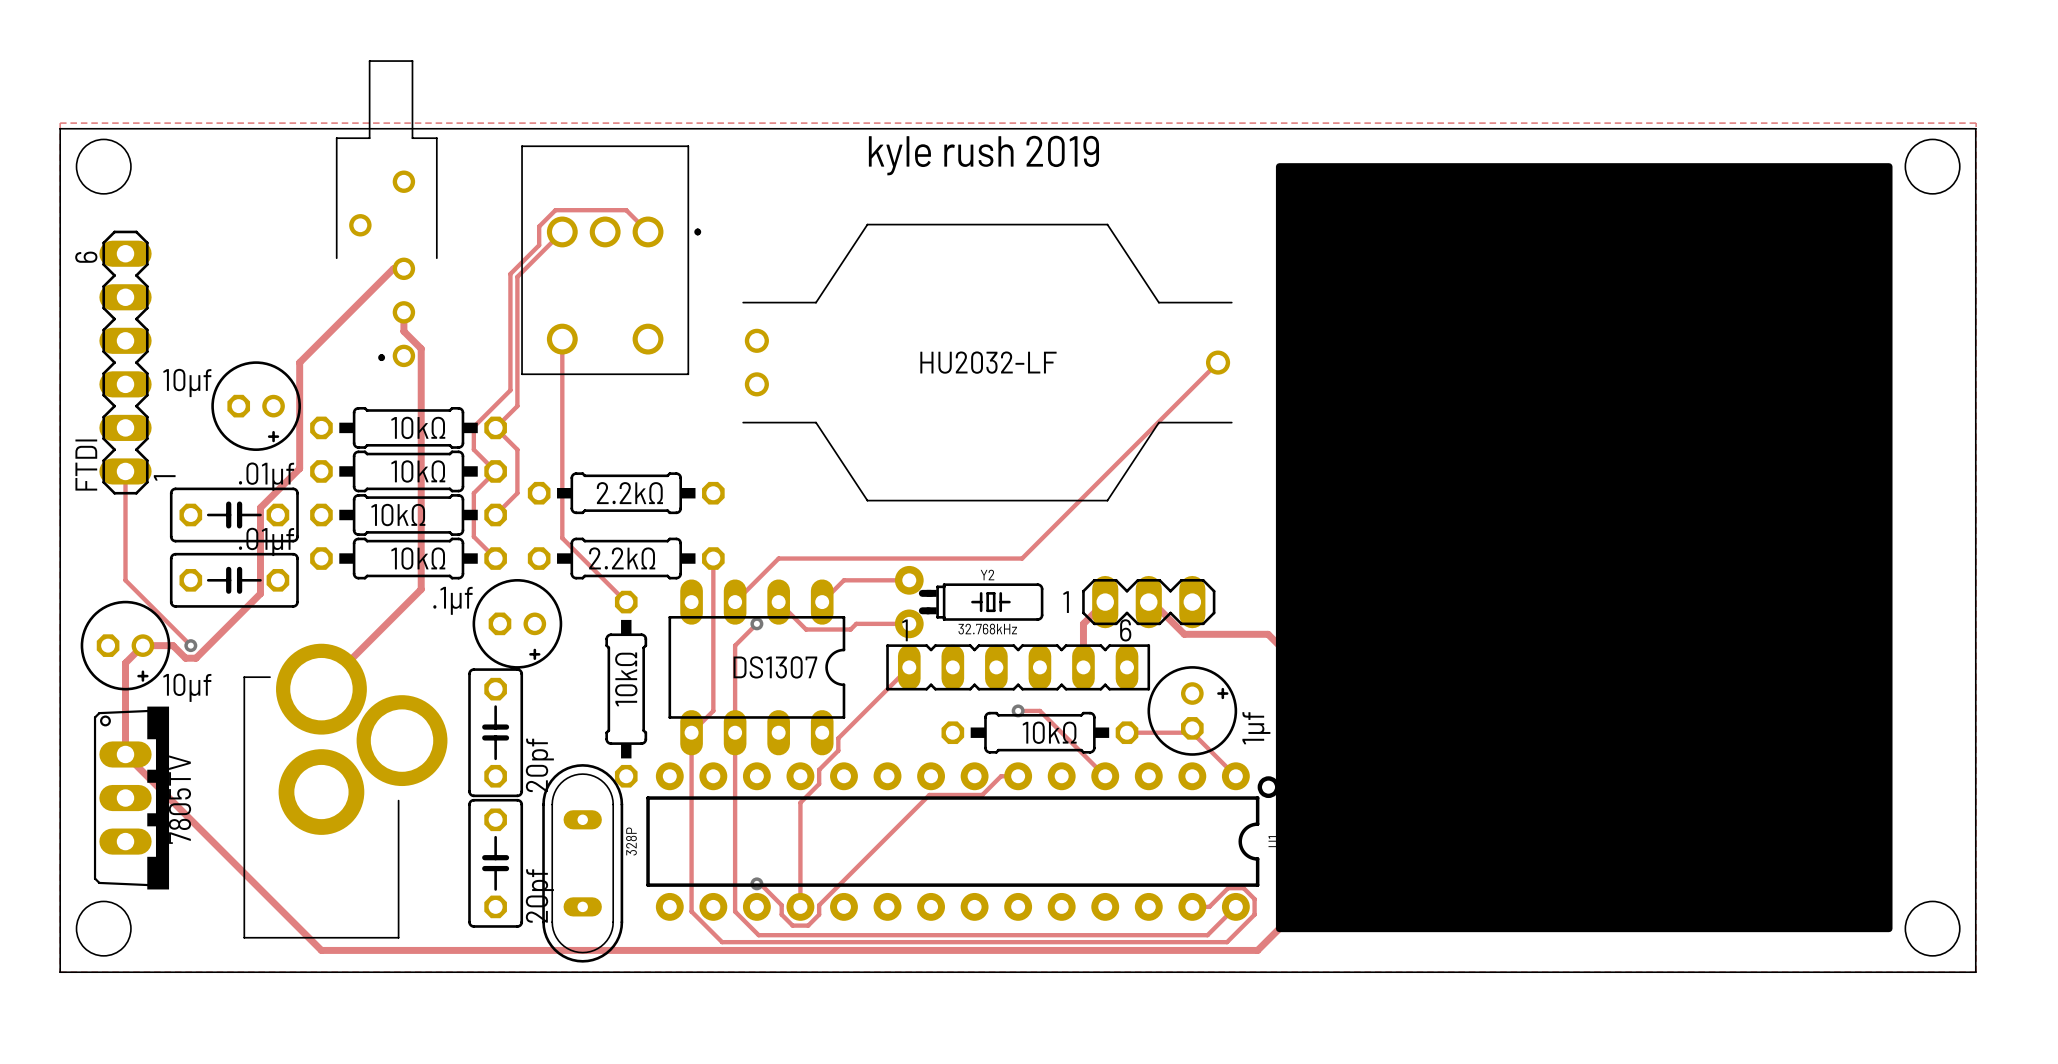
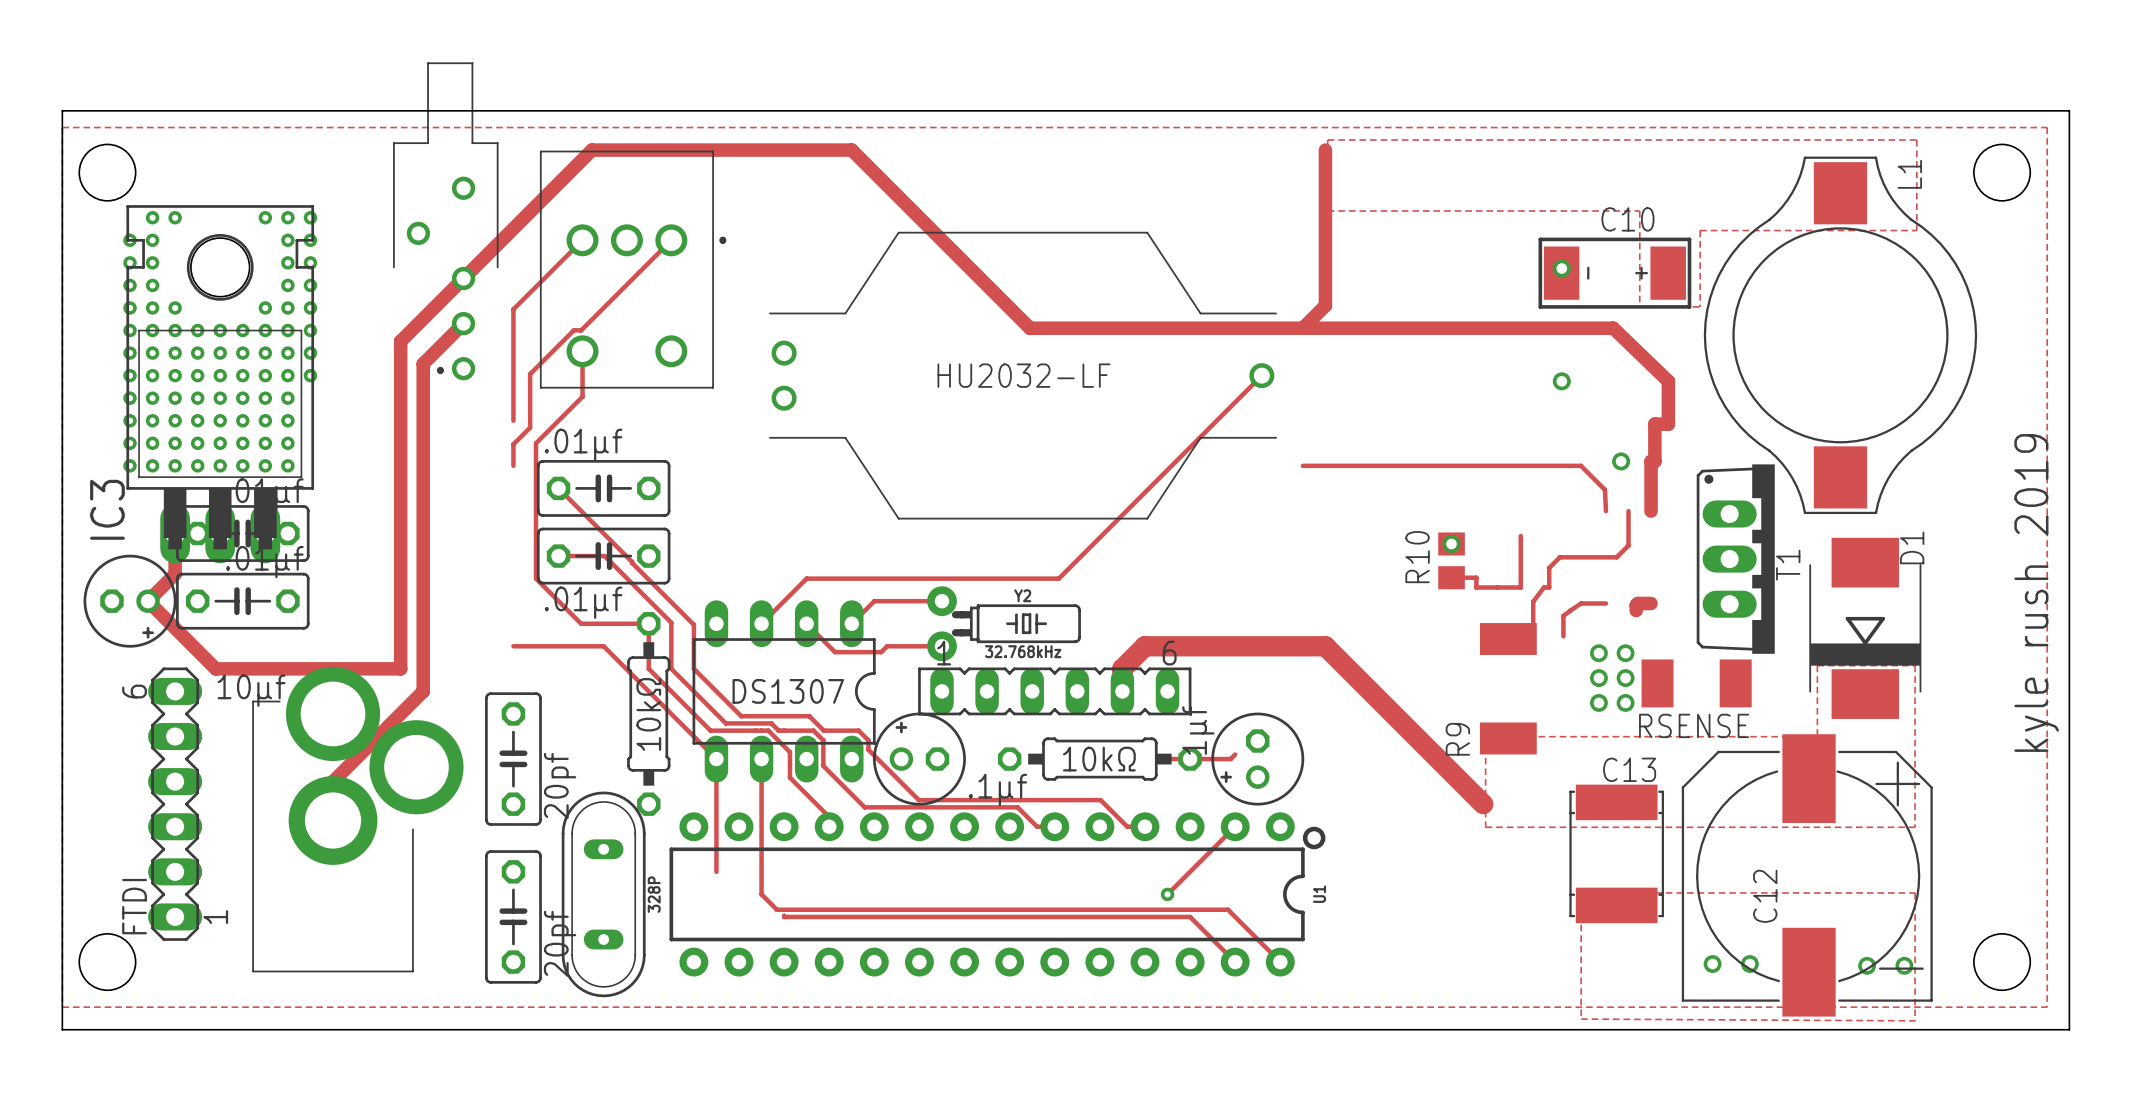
board edge: (60, 128) (1975, 128) (1975, 972) (60, 972) -> (62, 133) (62, 110) (2069, 110) (2069, 1029) (62, 1029) (62, 1007)
zone outline: none -> (1327, 139) (1916, 139) (1916, 230) (1700, 230) (1700, 306) (1639, 306) (1639, 211) (1327, 211) (1327, 139)
track: none -> (1325, 150) (1325, 305) (1302, 328)
text: kyle rush 2019 (983, 155) -> none
drawing: [1275, 163, 1893, 933] -> none
via: none -> (152, 217)
via: none -> (175, 217)
via: none -> (265, 217)
via: none -> (287, 217)
via: none -> (310, 217)
part position: (386, 213) -> (445, 221)
via: none -> (130, 240)
via: none -> (152, 240)
via: none -> (287, 240)
via: none -> (310, 240)
track: (648, 231) (626, 210) (555, 210) (539, 226) (539, 245) (510, 273) (510, 390) (473, 426) (473, 449) (495, 471) (473, 493) (473, 536) (495, 558) -> (671, 240) (581, 330) (573, 330) (530, 374) (530, 427) (513, 444) (513, 465)
via: none -> (130, 262)
via: none -> (152, 262)
via: none -> (287, 262)
via: none -> (310, 262)
via: none -> (1561, 268)
C10: none -> (1614, 273)
track: (403, 268) (393, 268) (299, 362) (299, 468) (260, 507) (260, 593) (196, 658) (185, 658) (173, 645) (142, 645) (125, 663) (125, 754) (321, 950) (1257, 950) (1301, 906) (1301, 667) (1268, 634) (1184, 634) (1152, 602) (1148, 602) -> none
via: none -> (130, 285)
via: none -> (152, 285)
via: none -> (287, 285)
via: none -> (310, 285)
track: (517, 276) (517, 406) (495, 427) (517, 449) -> (536, 286) (513, 309) (513, 420)
via: none -> (130, 307)
via: none -> (152, 307)
via: none -> (175, 307)
via: none -> (265, 307)
via: none -> (287, 307)
via: none -> (310, 307)
track: (403, 312) (403, 331) (421, 348) (421, 589) (321, 689) -> none
track: none -> (463, 323) (423, 363) (423, 691) (333, 781)
via: none -> (130, 330)
via: none -> (152, 330)
via: none -> (175, 330)
via: none -> (197, 330)
via: none -> (220, 330)
via: none -> (242, 330)
via: none -> (265, 330)
via: none -> (287, 330)
via: none -> (310, 330)
L1: none -> (1840, 335)
via: none -> (130, 353)
via: none -> (152, 353)
via: none -> (175, 353)
via: none -> (197, 353)
via: none -> (220, 353)
via: none -> (242, 353)
via: none -> (265, 353)
via: none -> (287, 353)
via: none -> (310, 353)
FTDI position: (125, 362) -> (175, 804)
via: none -> (130, 375)
via: none -> (152, 375)
via: none -> (175, 375)
via: none -> (197, 375)
via: none -> (220, 375)
via: none -> (242, 375)
via: none -> (265, 375)
via: none -> (287, 375)
via: none -> (310, 375)
via: none -> (1561, 381)
IC3: none -> (220, 384)
track: (562, 382) (562, 538) (626, 602) -> (582, 396) (536, 443) (536, 465)
via: none -> (130, 398)
via: none -> (152, 398)
via: none -> (175, 398)
via: none -> (197, 398)
via: none -> (220, 398)
via: none -> (242, 398)
via: none -> (265, 398)
via: none -> (287, 398)
via: none -> (130, 420)
via: none -> (152, 420)
via: none -> (175, 420)
via: none -> (197, 420)
via: none -> (220, 420)
via: none -> (242, 420)
part: 10μf (256, 406) -> none
via: none -> (265, 420)
via: none -> (287, 420)
via: none -> (130, 443)
via: none -> (152, 443)
via: none -> (175, 443)
via: none -> (197, 443)
via: none -> (220, 443)
via: none -> (242, 443)
via: none -> (265, 443)
via: none -> (287, 443)
part: 10kΩ (408, 427) -> none
via: none -> (1621, 461)
via: none -> (130, 465)
via: none -> (152, 465)
via: none -> (175, 465)
via: none -> (197, 465)
via: none -> (220, 465)
via: none -> (242, 465)
via: none -> (265, 465)
via: none -> (287, 465)
track: none -> (1302, 465) (1580, 465) (1604, 489) (1605, 511)
track: (125, 471) (125, 580) (190, 645) -> none
part: 10kΩ (408, 471) -> none
track: none -> (558, 488) (693, 624) (693, 668) (741, 716) (809, 716) (823, 730) (858, 730) (868, 740) (868, 749) (918, 800) (1100, 800) (1127, 826) (1144, 826)
part: none -> .01μf (603, 488)
track: none -> (175, 510) (175, 574) (148, 601) (215, 668) (400, 668) (400, 341) (591, 150) (851, 150) (1029, 328) (1613, 328) (1668, 381) (1668, 424) (1654, 424) (1654, 461) (1651, 461) (1651, 511)
track: (517, 493) (495, 514) -> (536, 510) (536, 578) (581, 623) (648, 623) (648, 668) (710, 730) (768, 730) (789, 752) (789, 777) (829, 816) (829, 826)
part: 2.2kΩ (626, 493) -> none
track: none -> (1628, 511) (1628, 545) (1616, 557) (1559, 557) (1549, 567) (1549, 587) (1543, 587) (1533, 601) (1533, 624) (1508, 639)
part: 10kΩ (408, 514) -> none
track: none -> (1520, 536) (1520, 587) (1476, 587) (1476, 577) (1451, 577)
via: none -> (1451, 544)
track: none -> (558, 556) (604, 556) (671, 622) (671, 668) (725, 723) (771, 723) (778, 730) (813, 730) (823, 740) (823, 765) (864, 807) (1017, 807) (1037, 826) (1054, 826)
part: none -> .01μf (603, 556)
T1: none -> (1735, 559)
R10: none -> (1451, 560)
part: 10kΩ (408, 558) -> none
part: 2.2kΩ (626, 558) -> none
track: (713, 558) (713, 710) (691, 732) -> (513, 646) (603, 646) (716, 759)
track: none -> (1605, 603) (1581, 603) (1563, 615) (1563, 636)
track: none -> (1651, 603) (1638, 603) (1636, 610)
track: (1105, 602) (1083, 623) (1083, 645) -> (1483, 804) (1325, 646) (1144, 646) (1122, 668)
part: (1148, 602) -> none
D1: none -> (1865, 628)
text: none -> kyle rush 2019 (2036, 592)
part rotation: 0° (517, 623) -> 180° (919, 759)
part position: (517, 623) -> (919, 759)
track: (756, 623) (735, 645) (735, 732) -> none
via: (756, 623) -> none
via: none -> (1598, 653)
via: none -> (1625, 653)
zone outline: none -> (1817, 665) (1915, 665) (1915, 827) (1485, 827) (1485, 736) (1817, 736) (1817, 665)
part position: (125, 645) -> (130, 601)
via: (190, 645) -> none
via: none -> (1598, 678)
via: none -> (1625, 678)
RSENSE: none -> (1696, 683)
R9: none -> (1508, 688)
track: (909, 667) (838, 738) (838, 750) (819, 769) (819, 784) (800, 802) (800, 906) -> none
via: none -> (1598, 702)
via: none -> (1625, 702)
part value position: 10μf (187, 687) -> 10μf (251, 690)
track: (1018, 710) (1039, 710) (1105, 776) -> none
via: (1018, 710) -> none
part rotation: 0° (1192, 710) -> 180° (1257, 759)
track: (1190, 730) (1235, 776) -> none
part position: (1039, 732) -> (1099, 759)
track: (1018, 776) (1001, 776) (982, 794) (929, 794) (819, 905) (819, 914) (808, 925) (792, 925) (781, 914) (781, 905) (761, 885) -> (1235, 962) (1190, 916) (788, 916)
part: 7805TV (131, 798) -> none
track: none -> (1235, 826) (1167, 894)
C13: none -> (1616, 853)
track: (691, 841) (691, 911) (722, 942) (1227, 942) (1254, 914) (1254, 899) (1243, 888) (1228, 888) (1209, 906) (1192, 906) -> none
U1 position: (962, 841) -> (997, 894)
C12: none -> (1807, 875)
zone outline: none -> (1581, 892) (1581, 1019) (1915, 1020) (1915, 892) (1581, 892)
part position: (495, 863) -> (513, 916)
track: (735, 863) (735, 911) (758, 935) (1207, 935) (1235, 906) -> (761, 894) (776, 909) (1227, 909) (1280, 962)
via: none -> (1167, 894)
via: (756, 883) -> none
via: none -> (1712, 964)
via: none -> (1749, 964)
via: none -> (1867, 965)
via: none -> (1904, 965)

